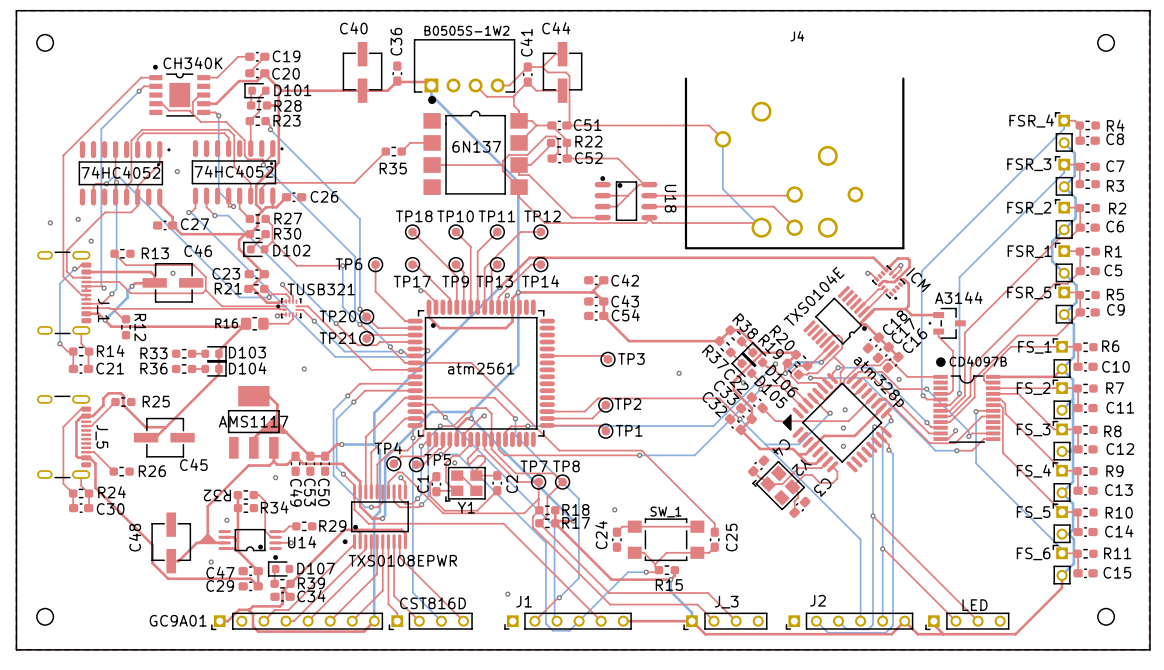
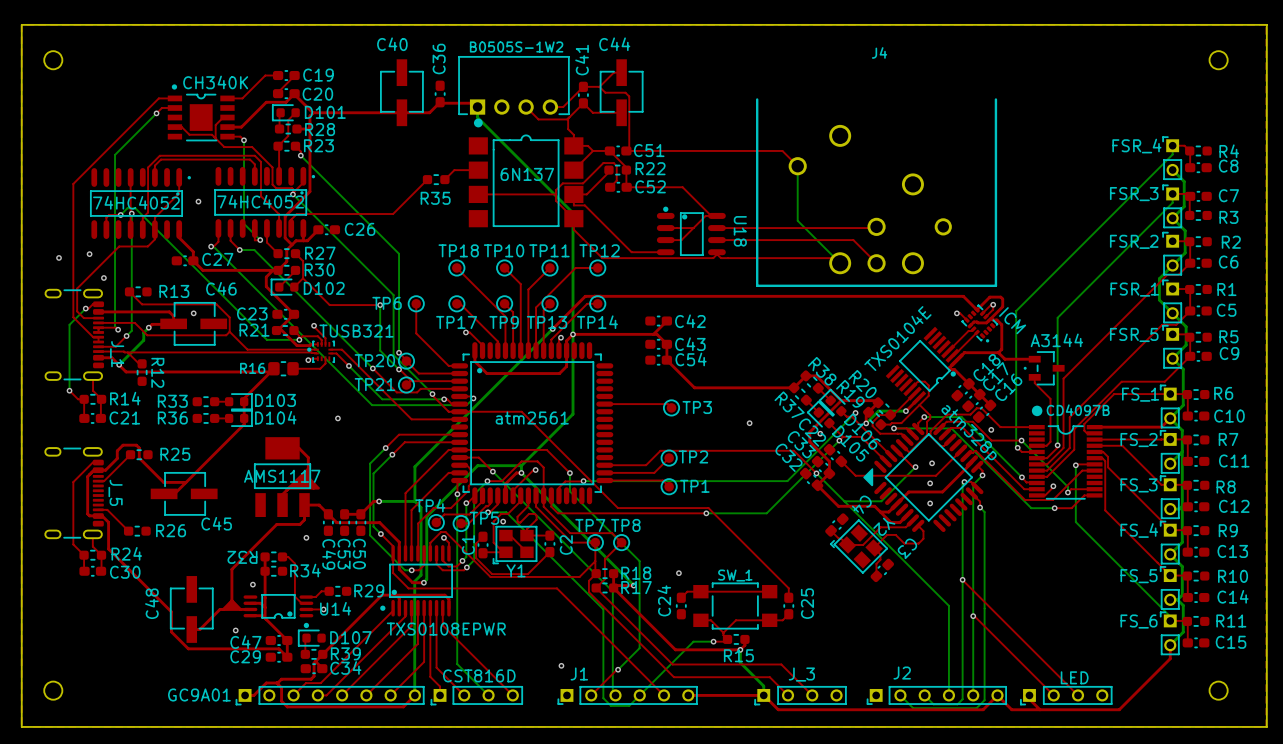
top track: (286, 432) (310, 456) -> none
top track: (295, 456) (287, 464) (277, 464) (273, 461) -> (328, 514) (319, 505) (304, 505)

